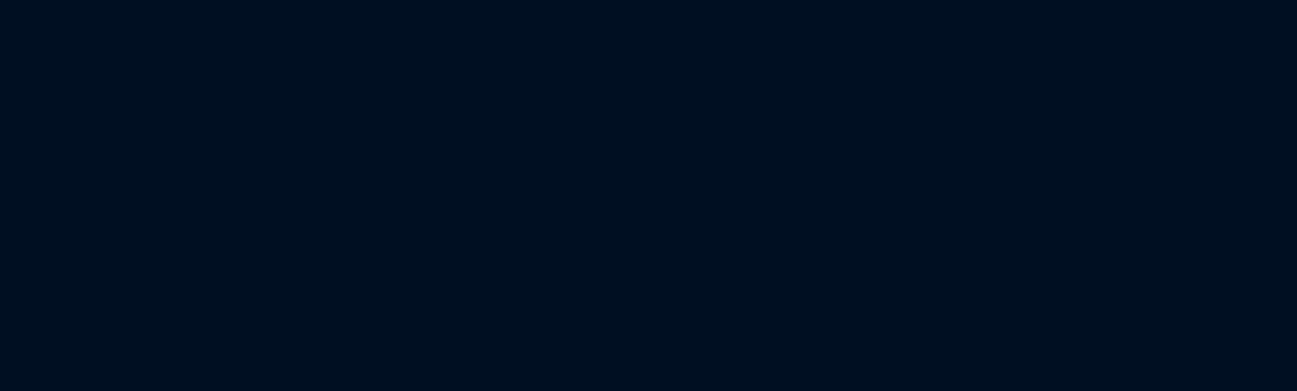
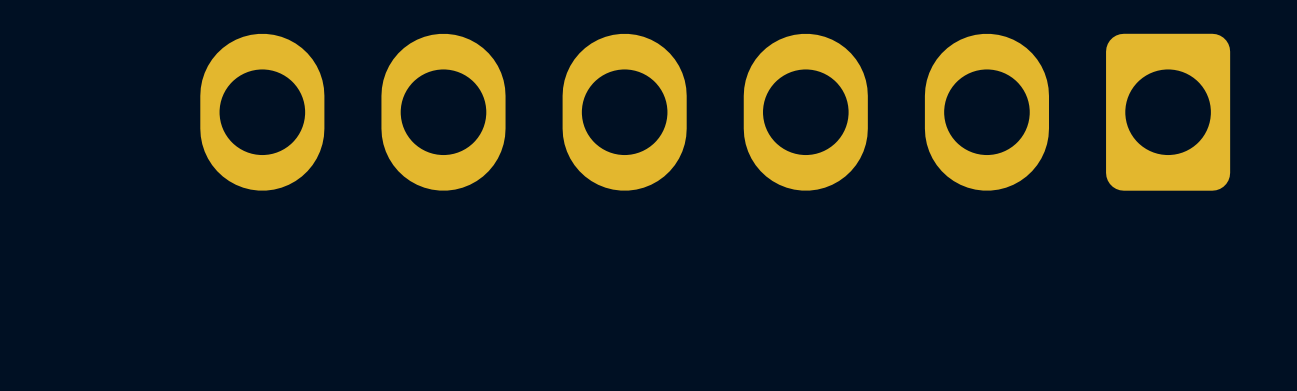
part: none -> (715, 112)

